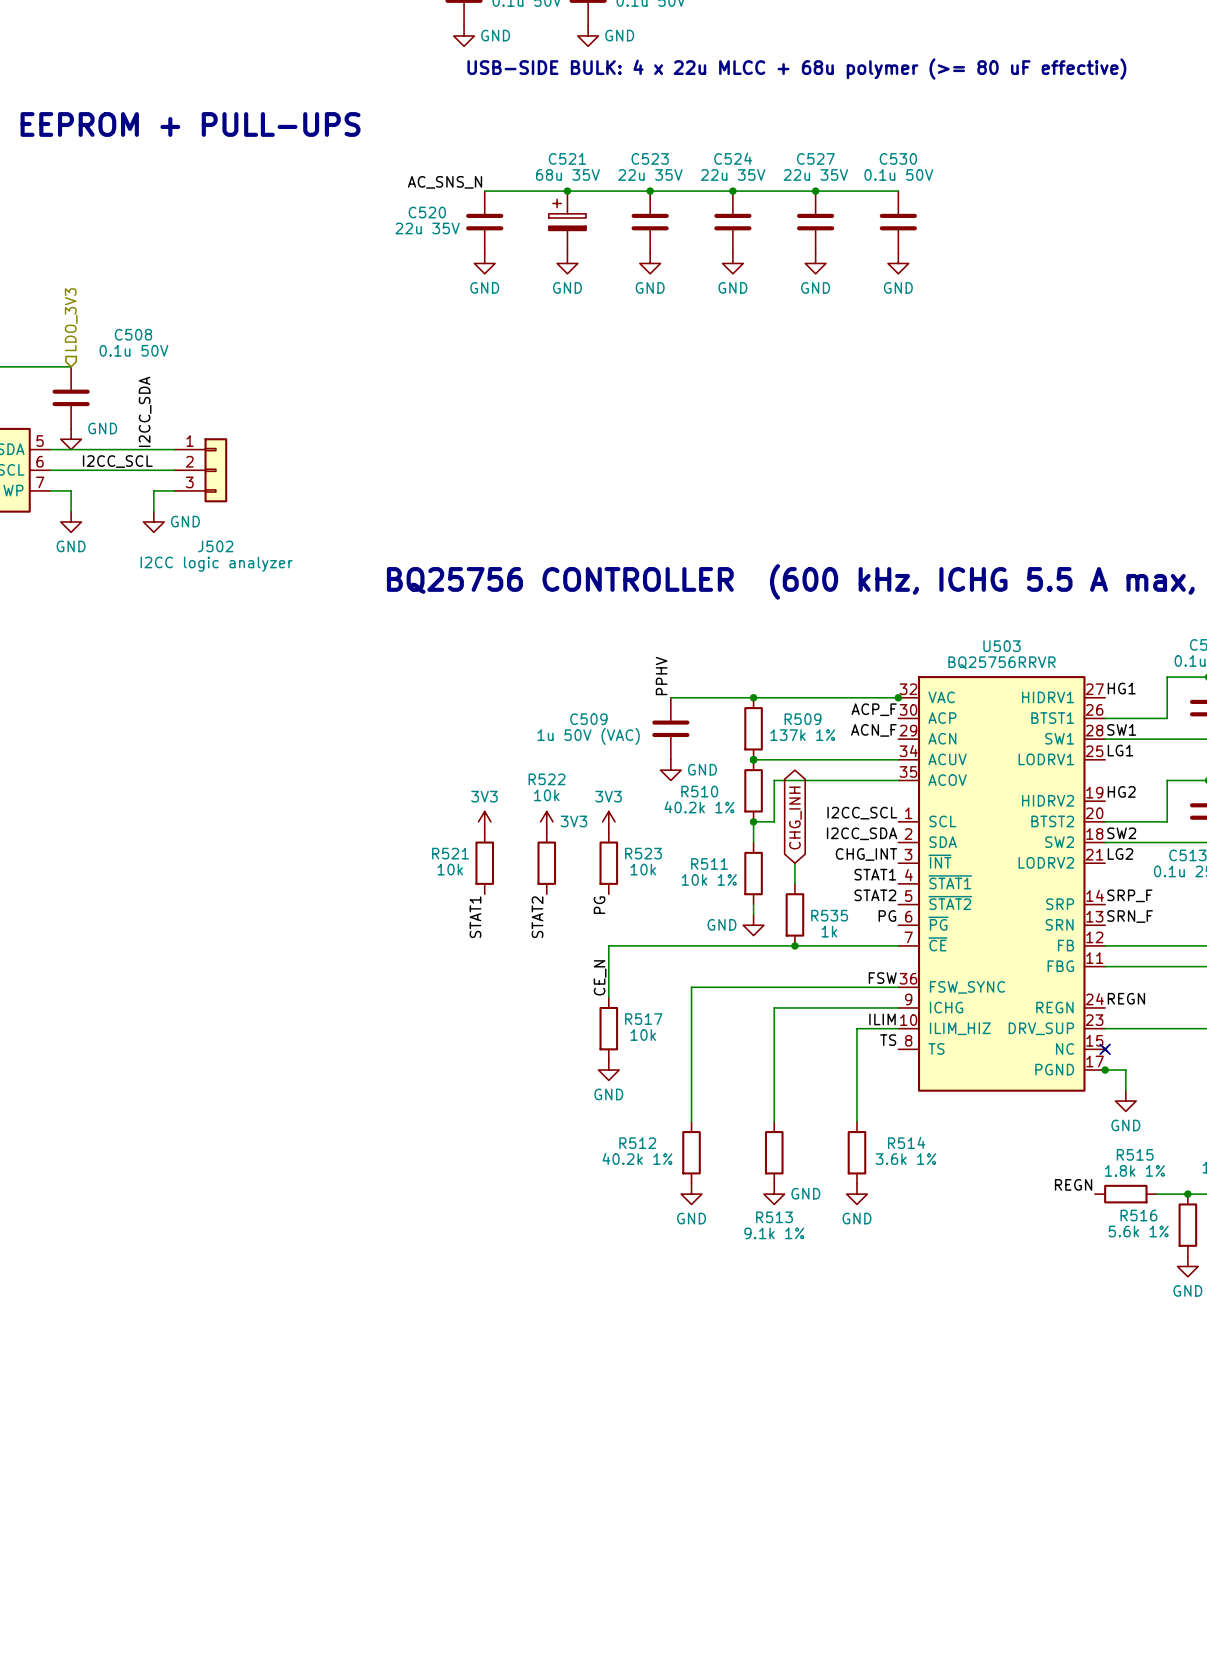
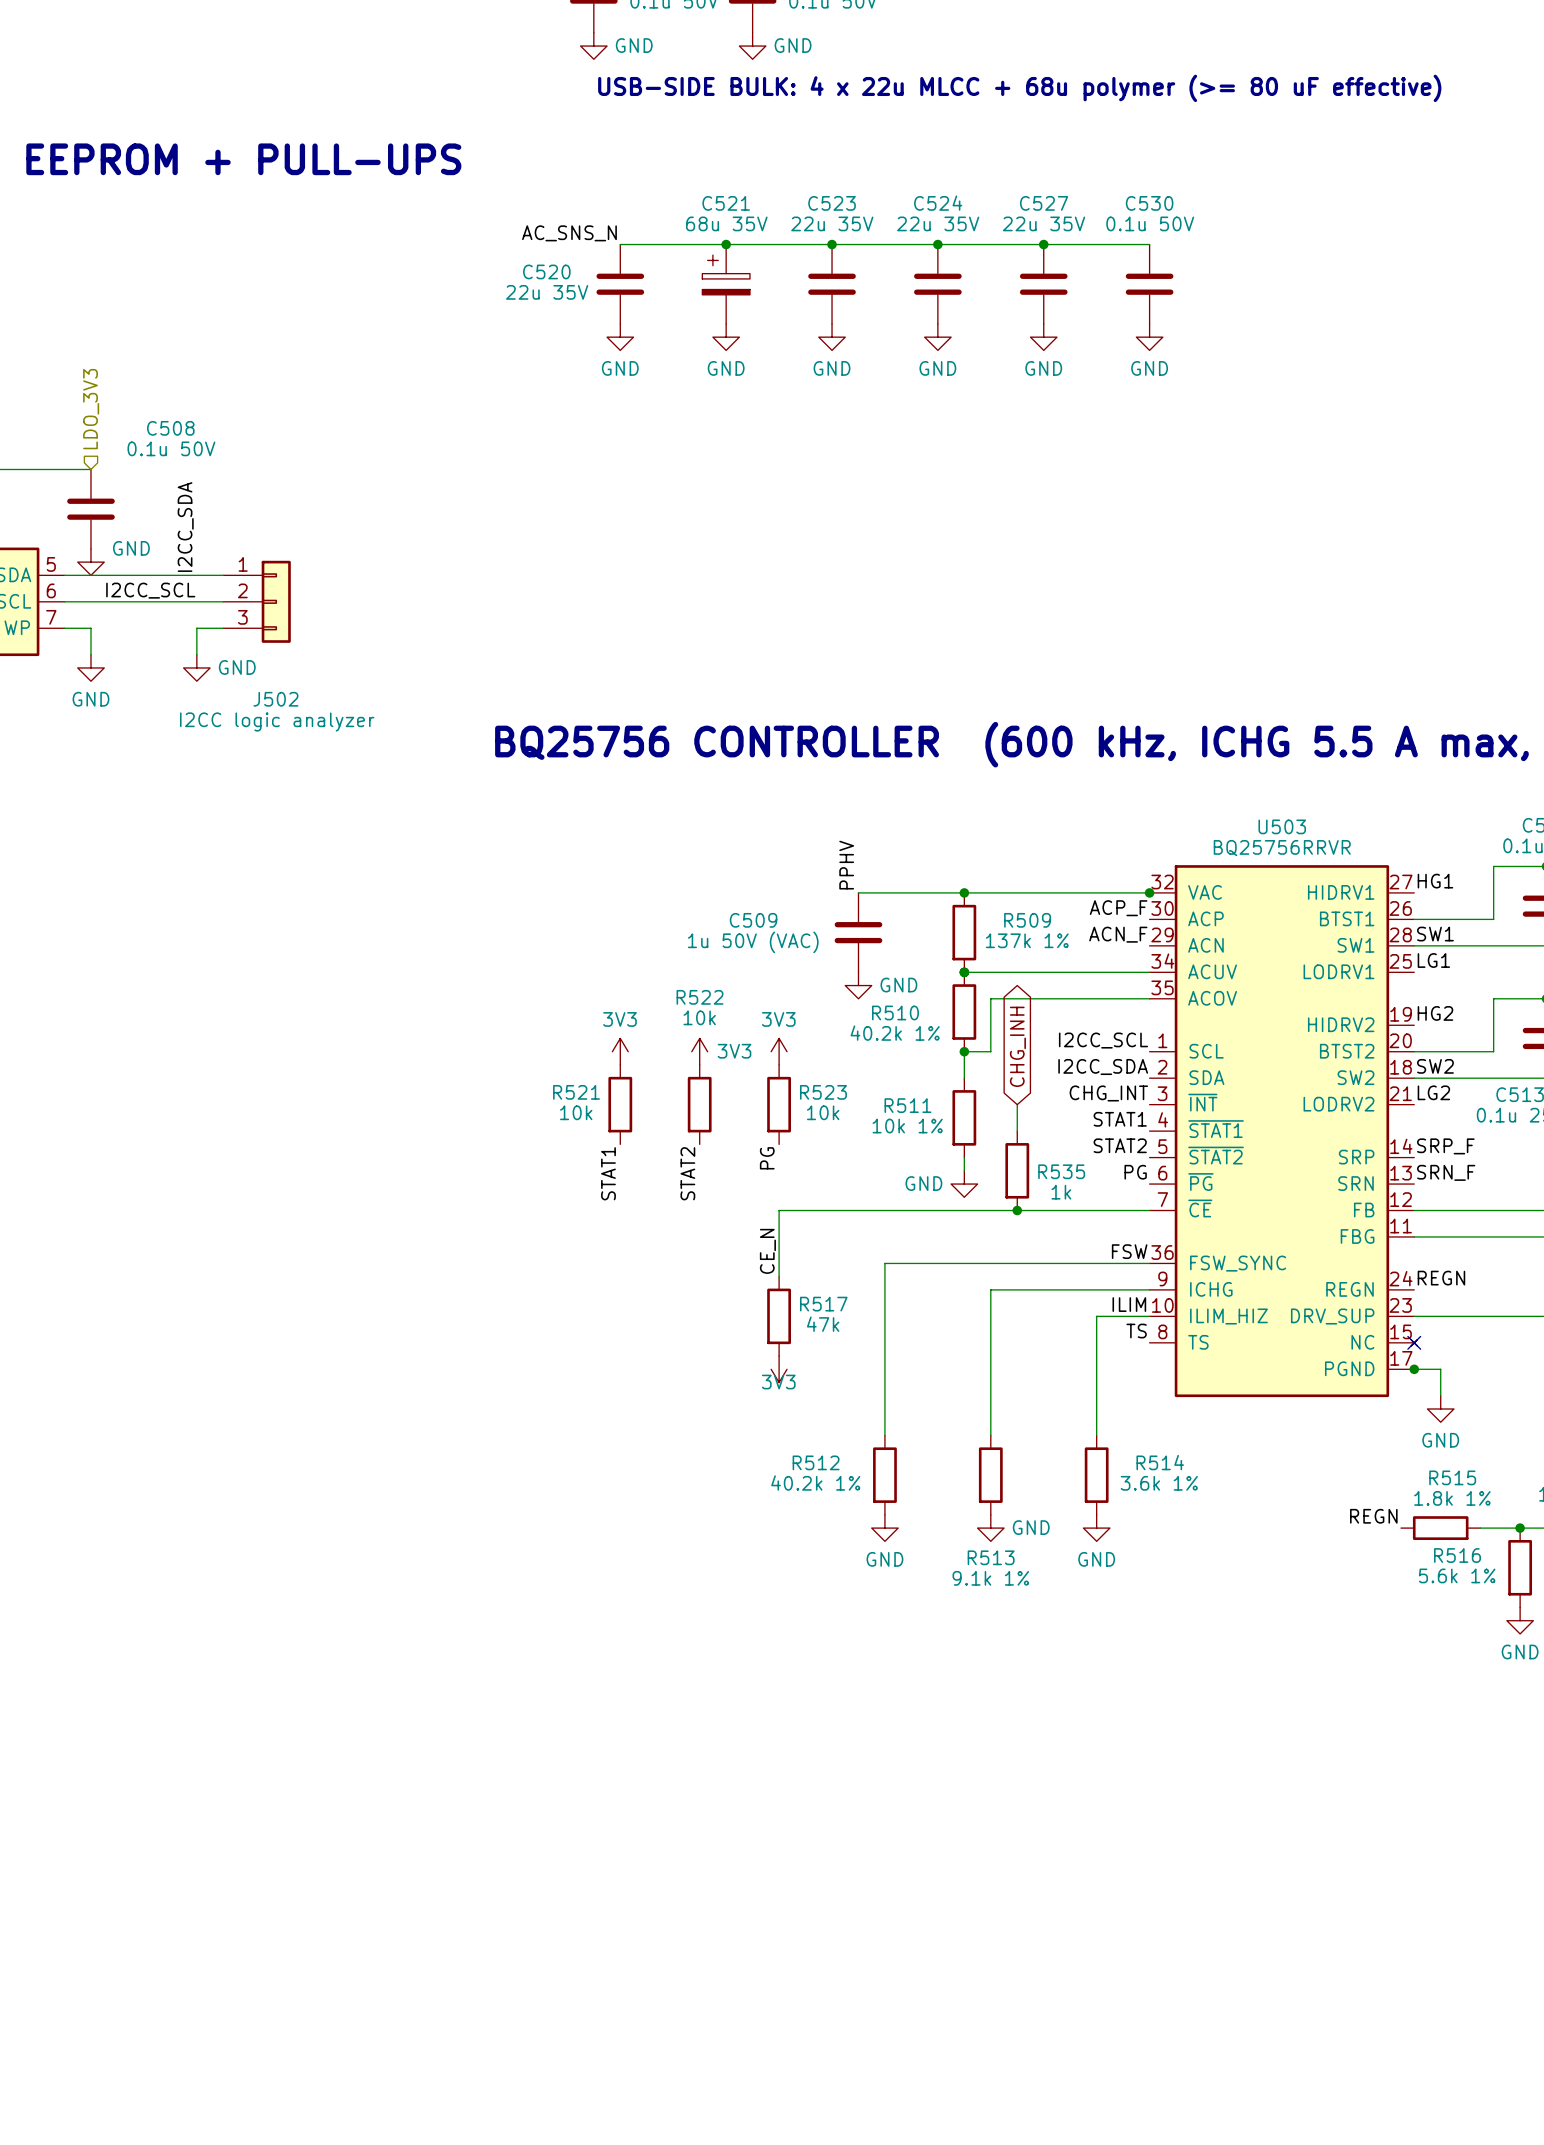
R517 value: 10k (643, 1035) -> 47k (823, 1324)
power symbol: GND (608, 1070) -> 3V3 (779, 1369)

